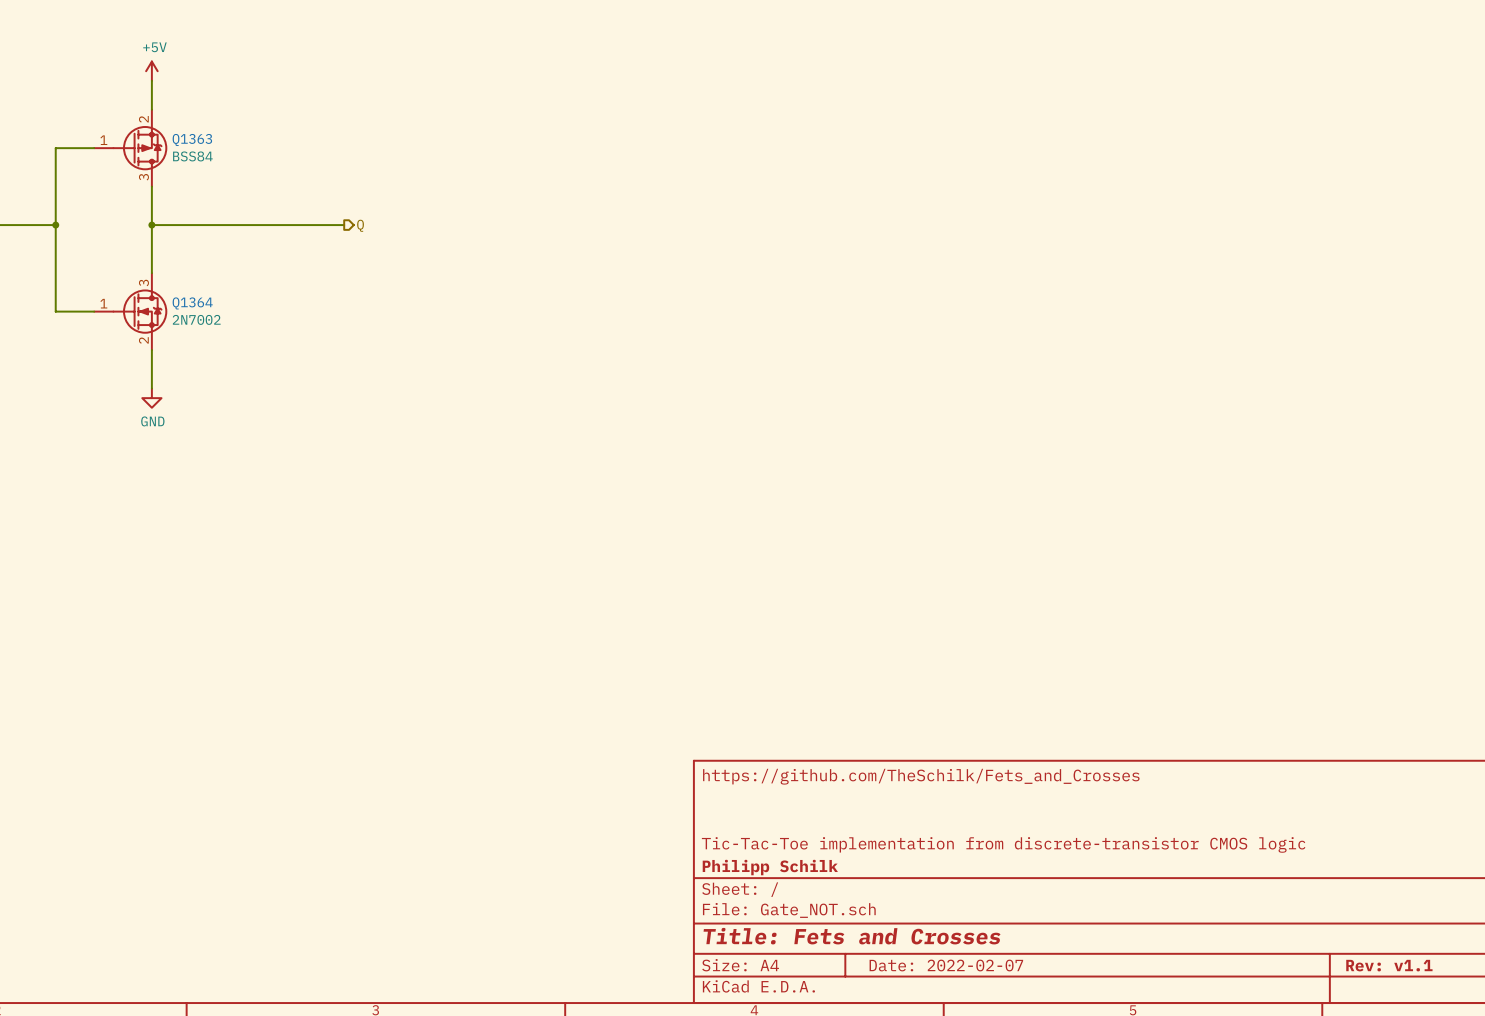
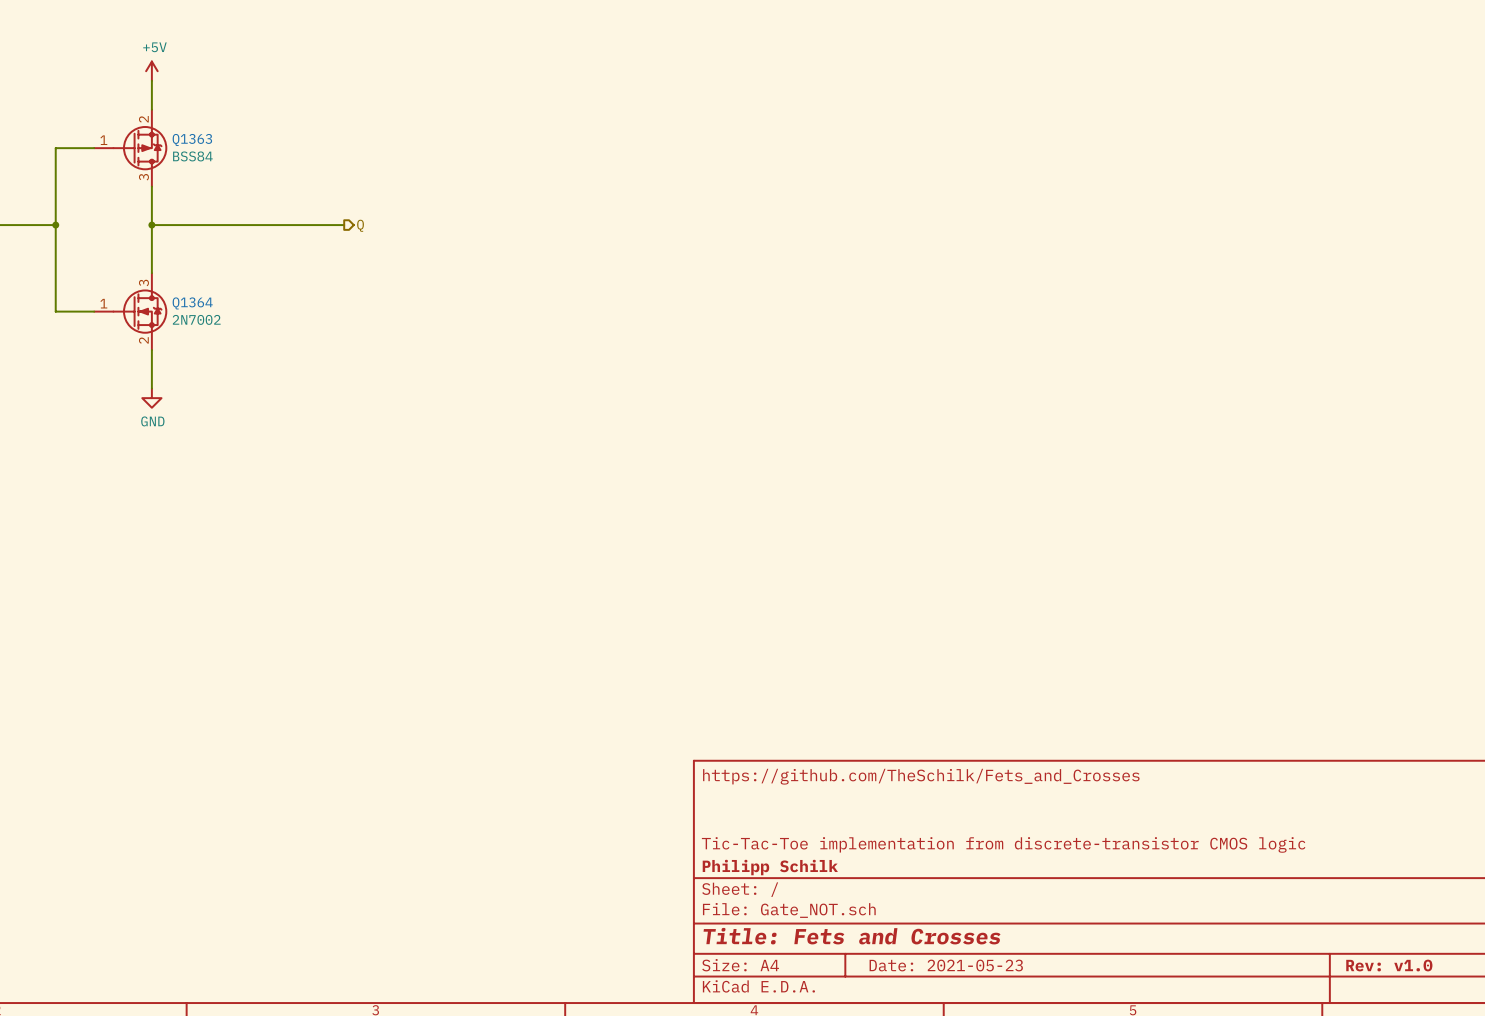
title block: Date: 2022-02-07 (946, 965) -> Date: 2021-05-23 (946, 965)
title block: Rev: v1.1 (1389, 965) -> Rev: v1.0 (1389, 965)

